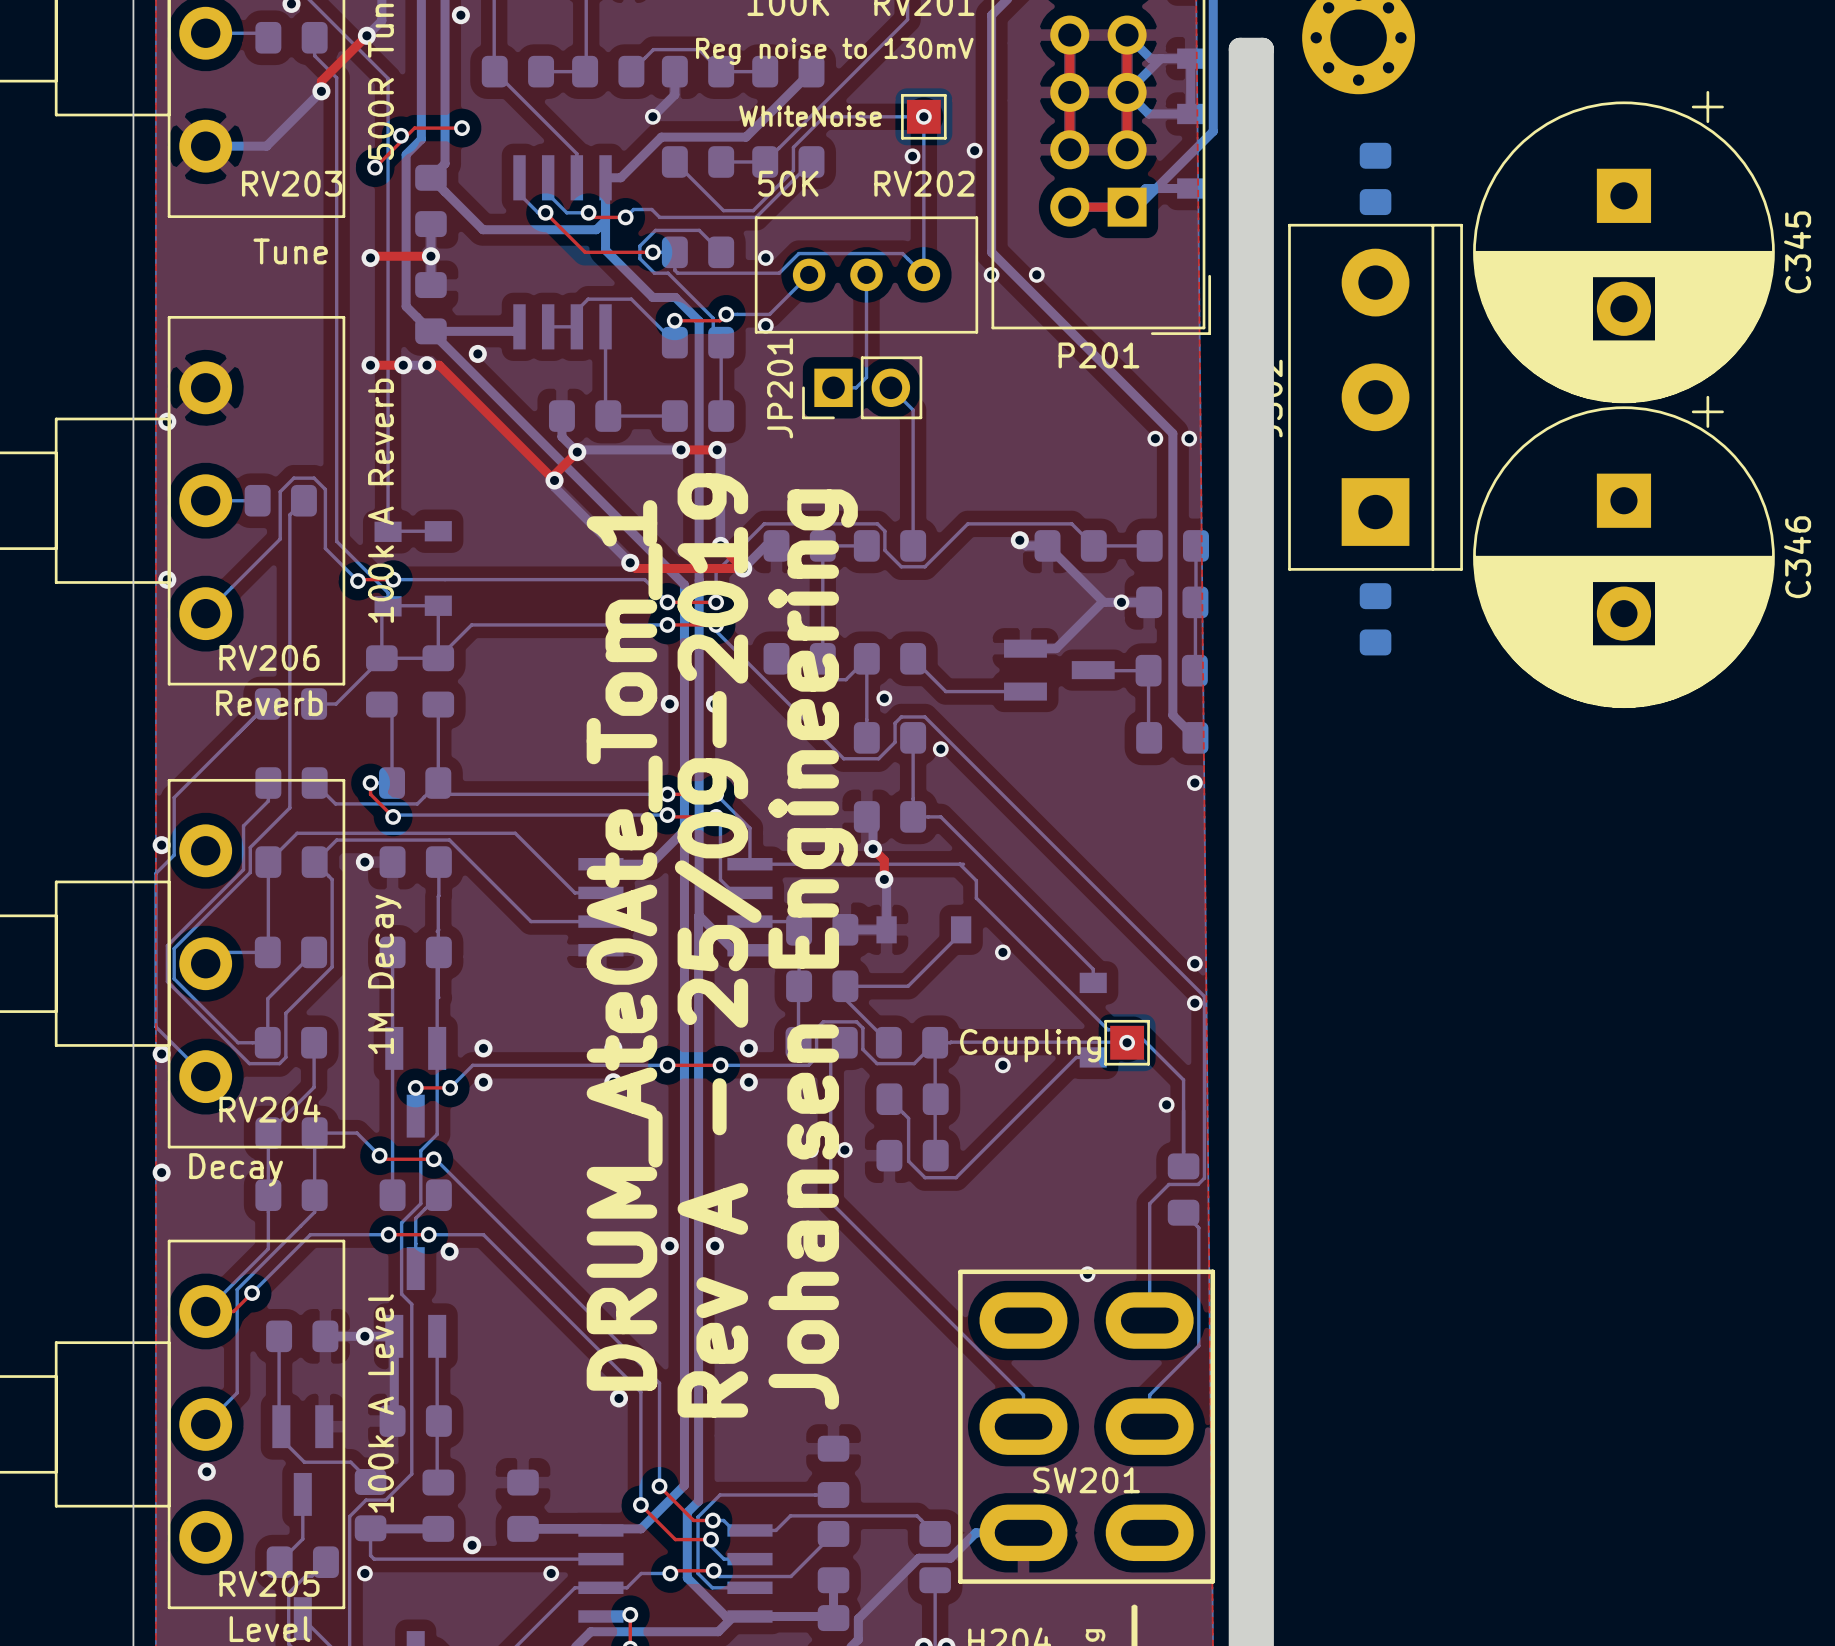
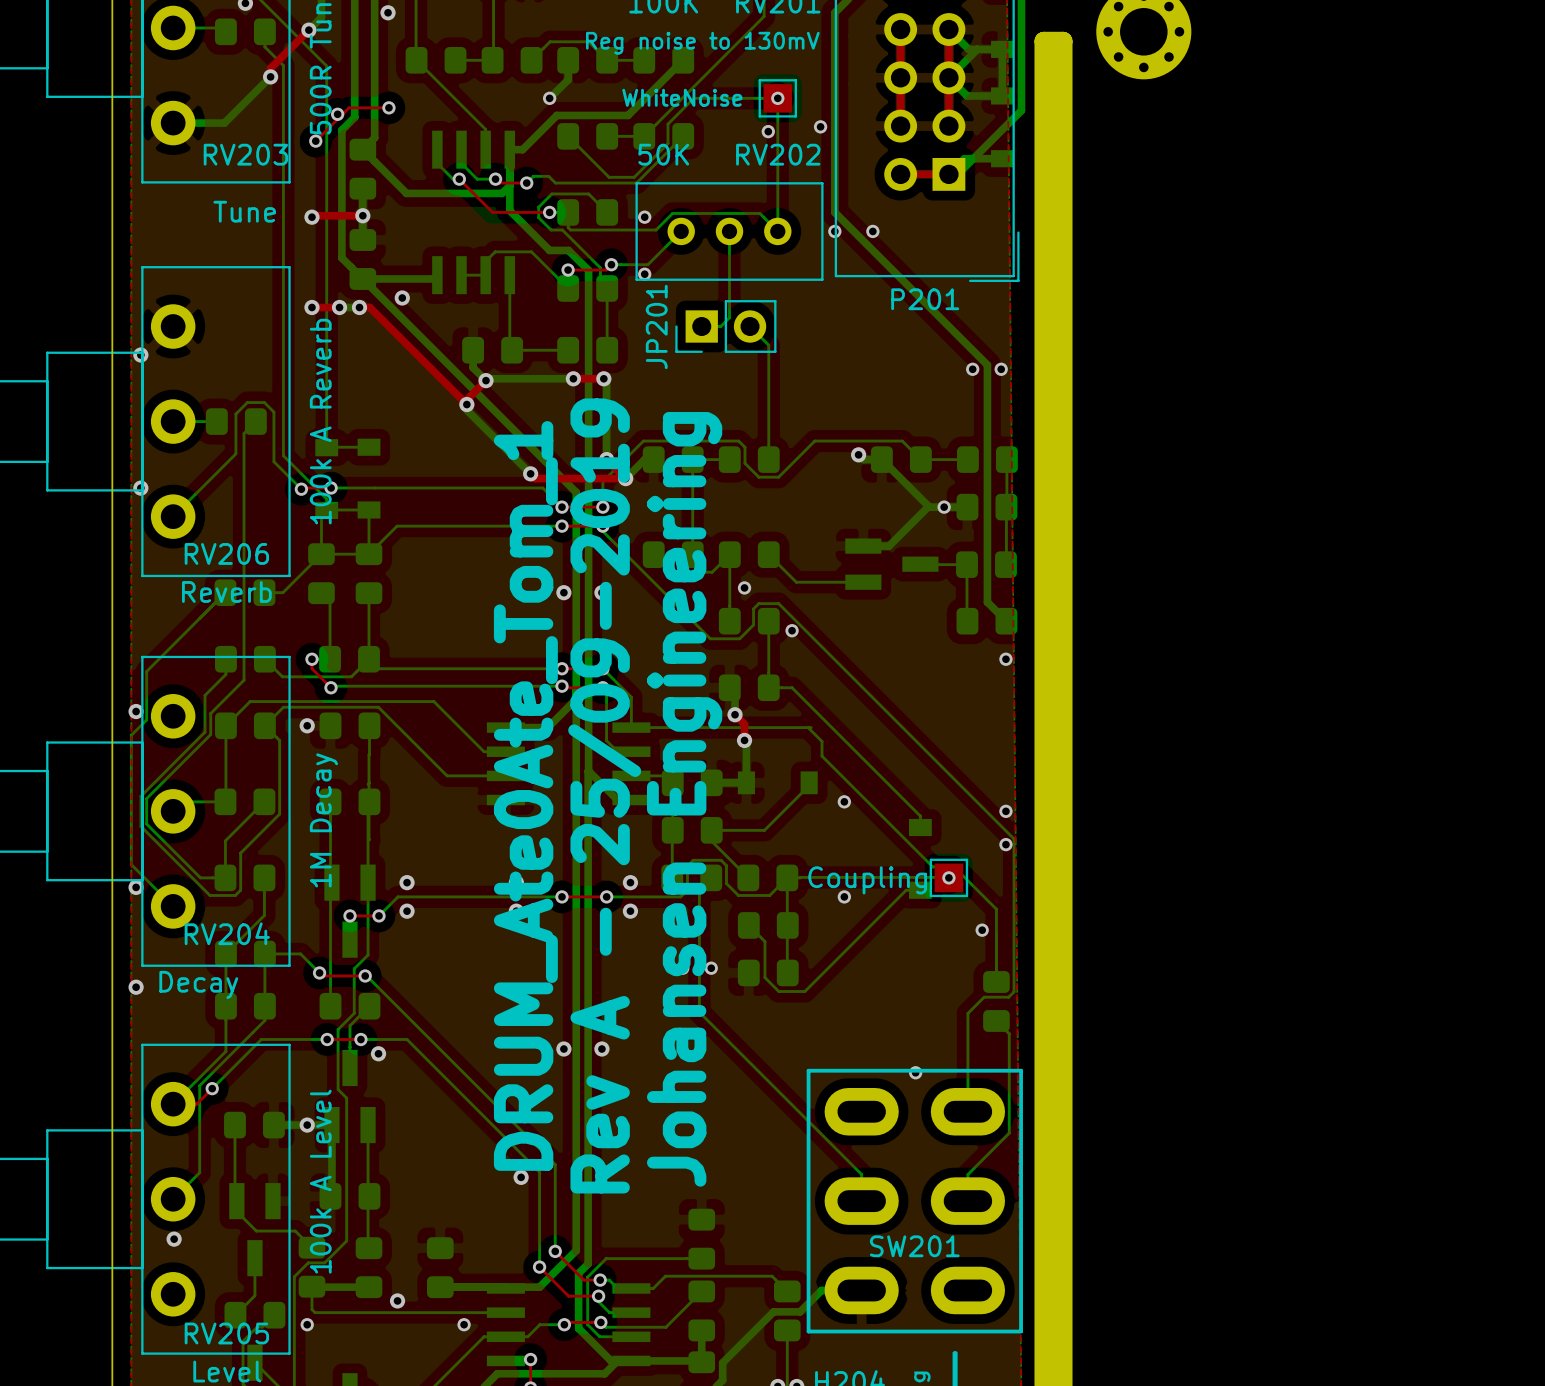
part: (1375, 178) -> none
C345: (1623, 247) -> none
part: (1375, 397) -> none
C346: (1623, 551) -> none
part: (1375, 619) -> none

